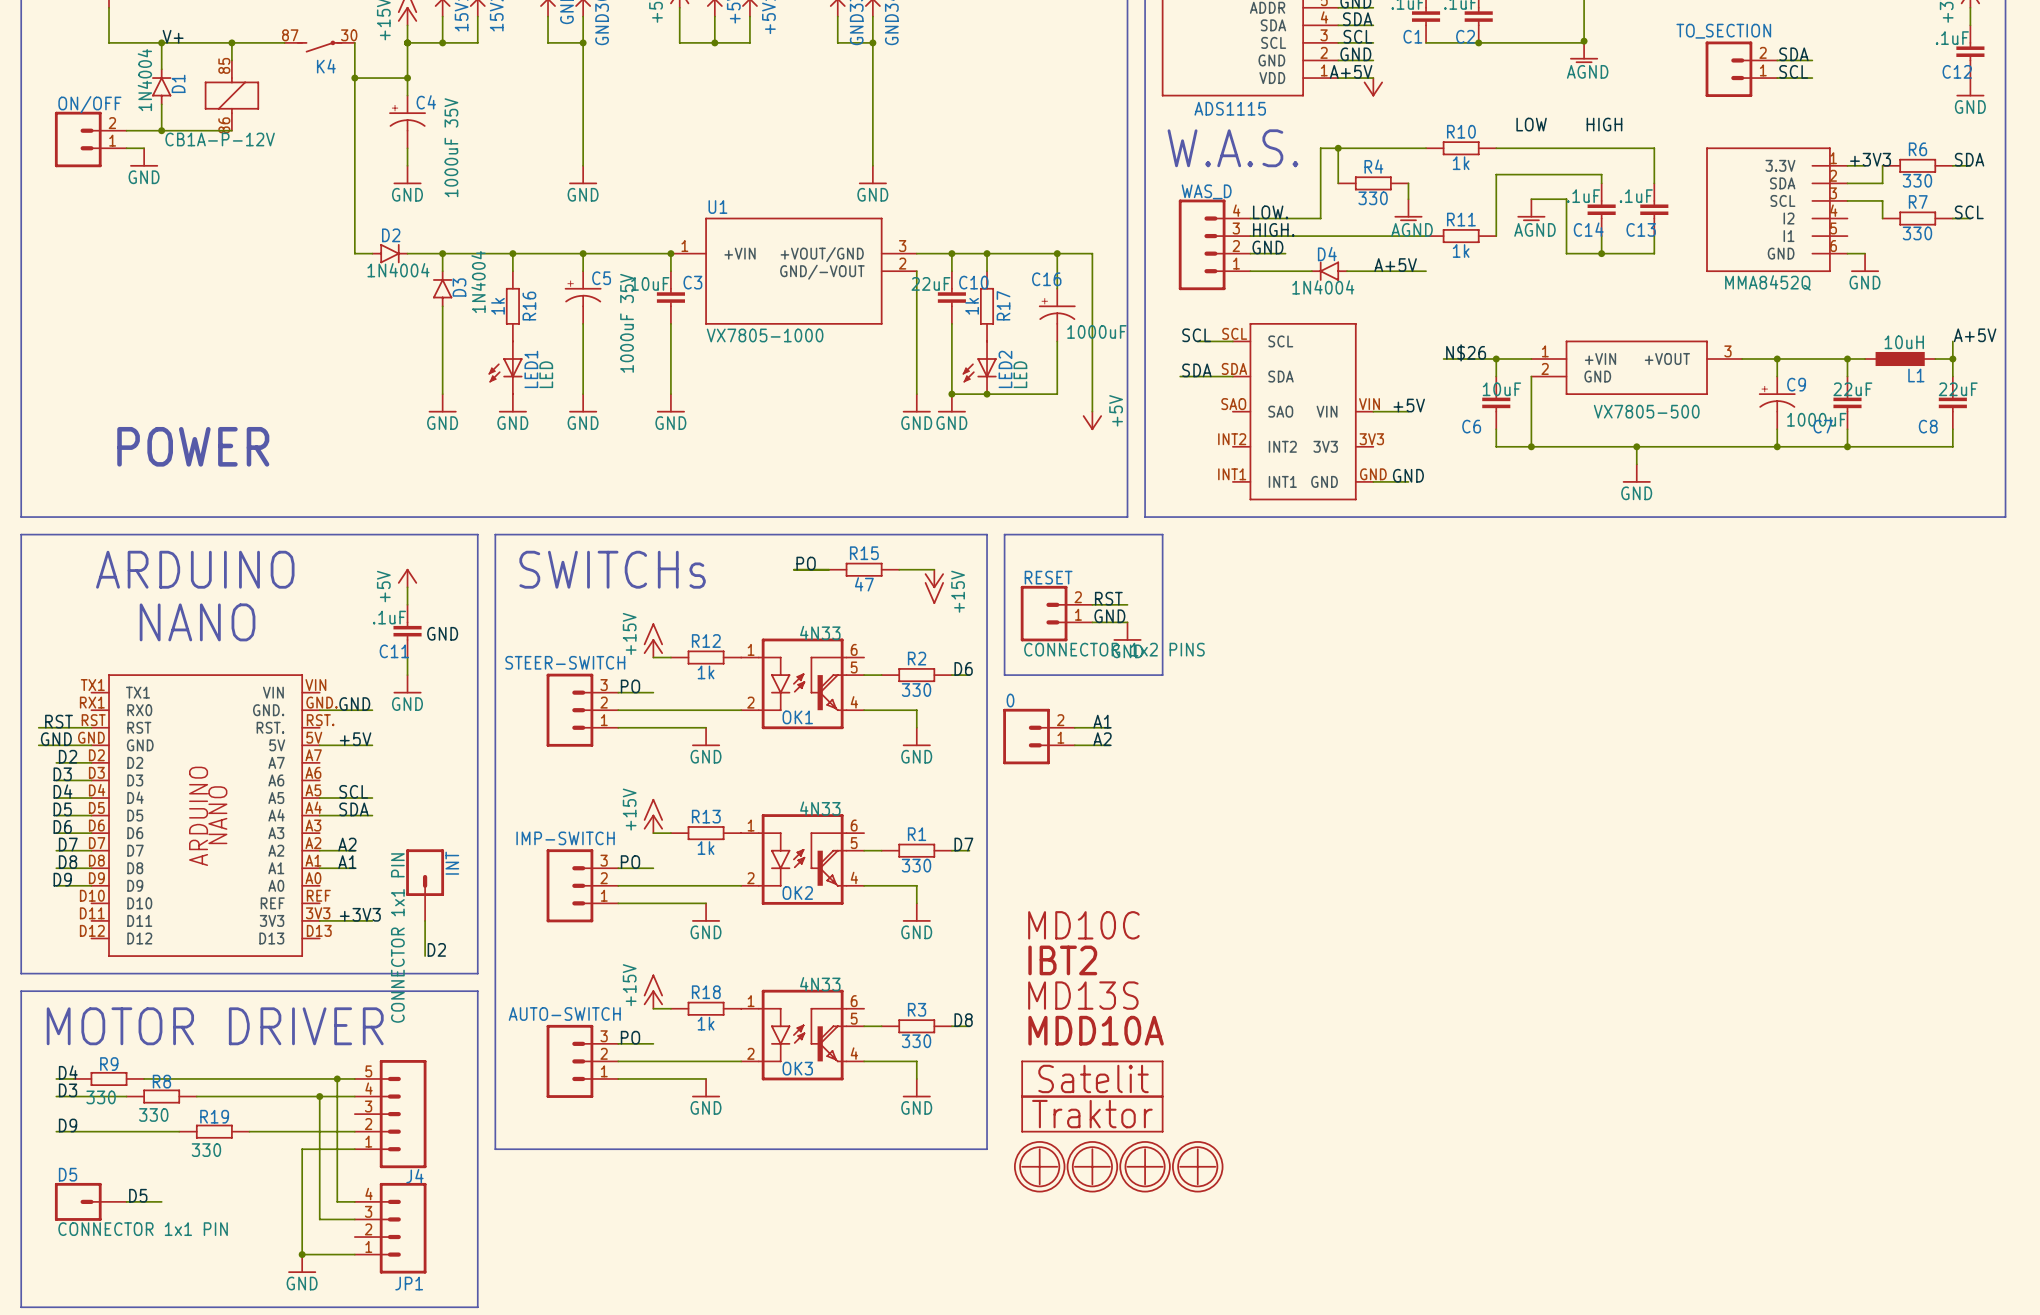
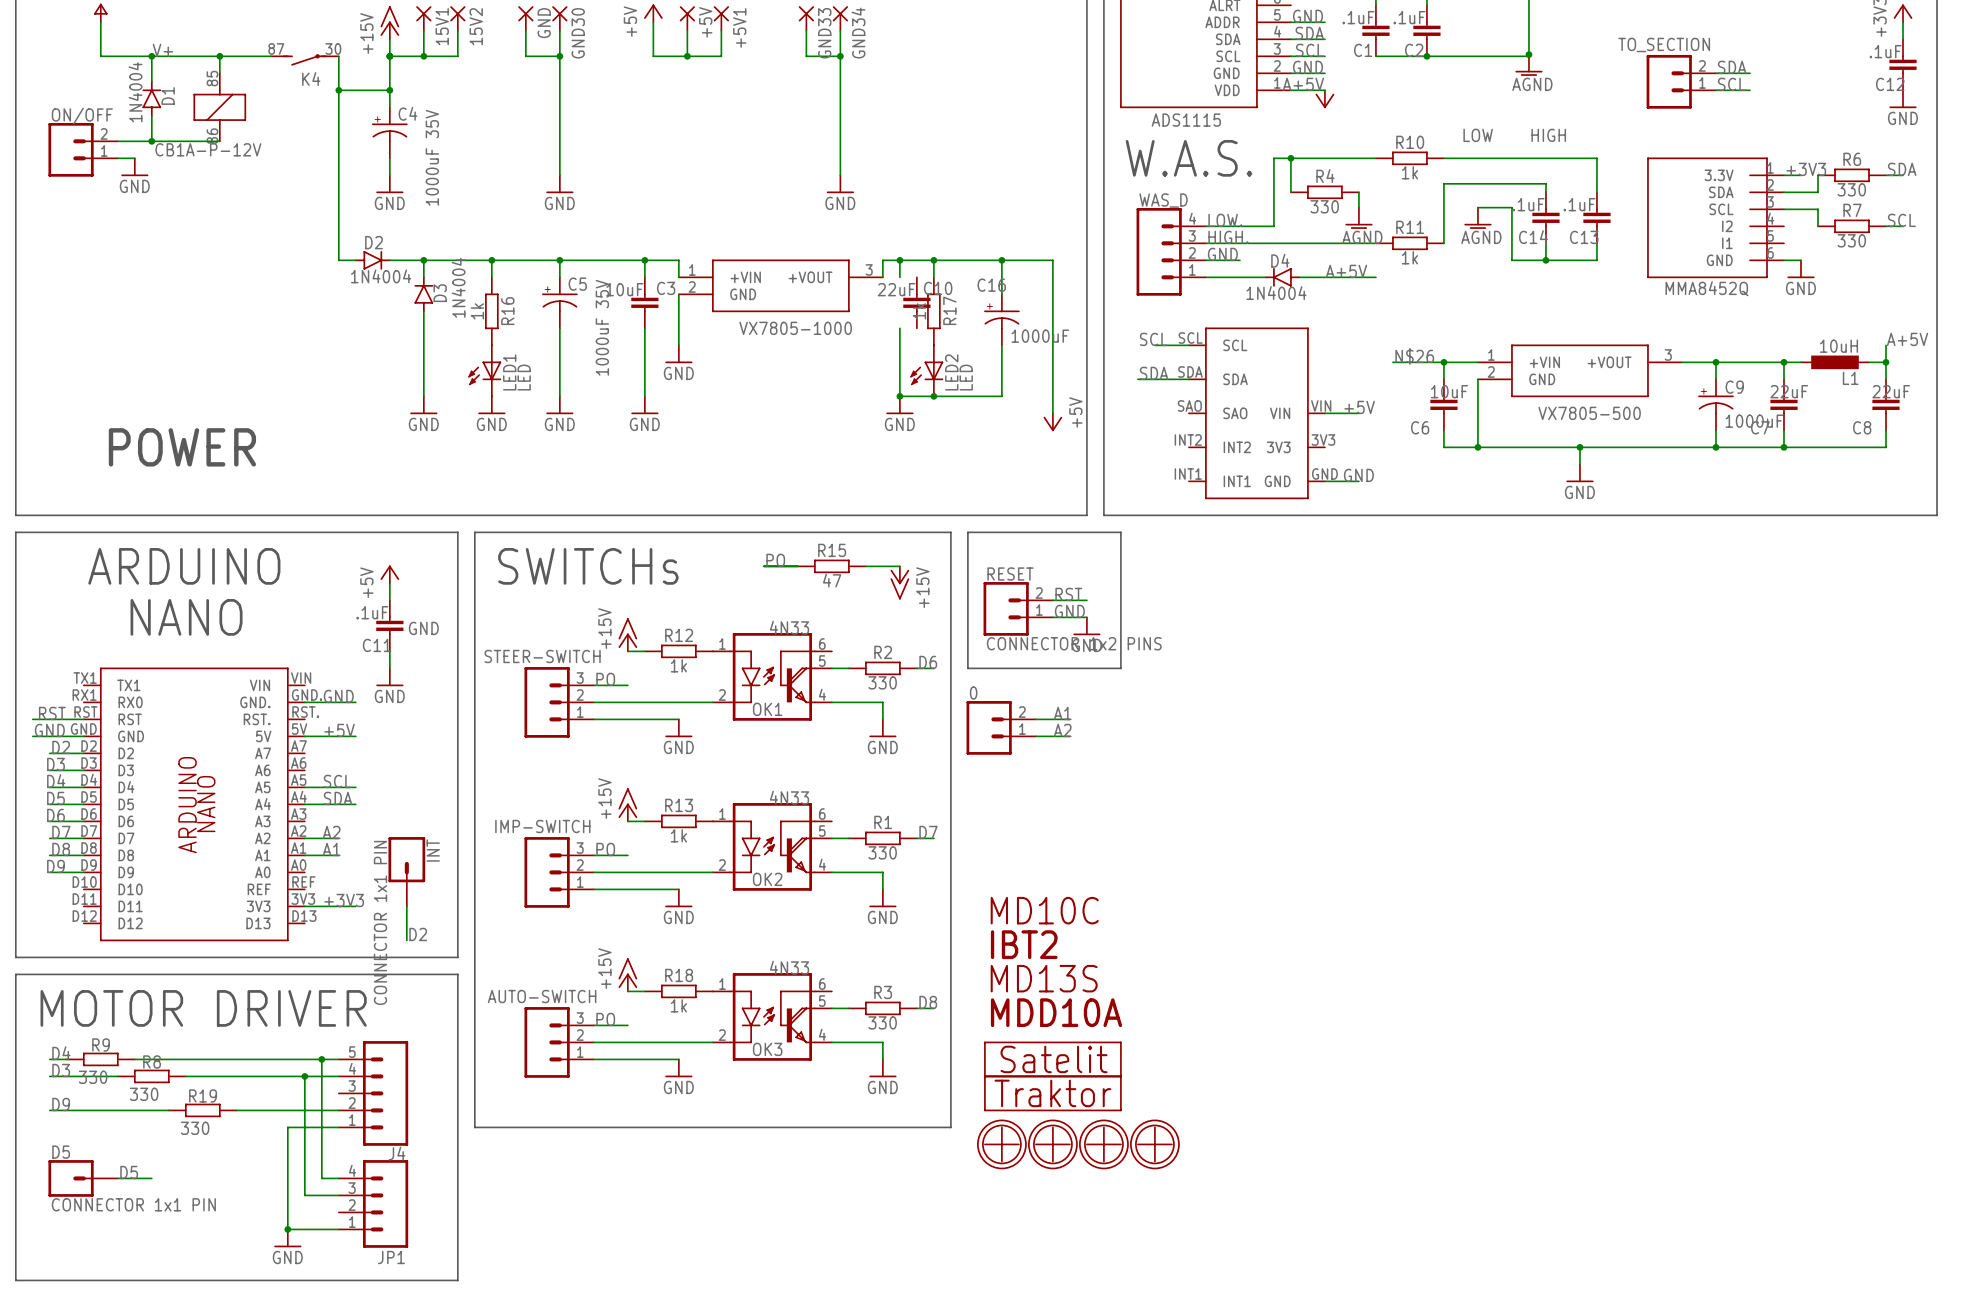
junction: none -> (899, 260)
wire: (951, 253) (951, 271) -> (899, 260) (899, 277)
junction: (951, 253) -> none
junction: none -> (933, 260)
wire: (987, 253) (987, 271) -> (933, 260) (933, 277)
junction: (987, 253) -> none
wire: (1057, 253) (1057, 288) -> (1001, 260) (1001, 294)
junction position: (1057, 253) -> (1001, 260)
U1: VX7805-1000 (793, 271) -> none
wire: (916, 271) (916, 394) -> (882, 277) (882, 260)
part: none -> VX7805-1000 (780, 285)
R17 position: (987, 306) -> (933, 311)
C16 position: (1057, 315) -> (1001, 319)
wire: (951, 323) (951, 394) -> (899, 328) (899, 396) (916, 396)
wire: (1057, 341) (1057, 394) (1039, 394) -> (1001, 345) (1001, 396)
power symbol: none -> GND (678, 354)
LED2 position: (979, 367) -> (926, 370)
junction: none -> (899, 396)
junction: (951, 394) -> none
junction: none -> (933, 396)
junction: (987, 394) -> none
power symbol: GND (916, 403) -> none
power symbol: none -> GND (899, 405)
power symbol: GND (951, 403) -> none

